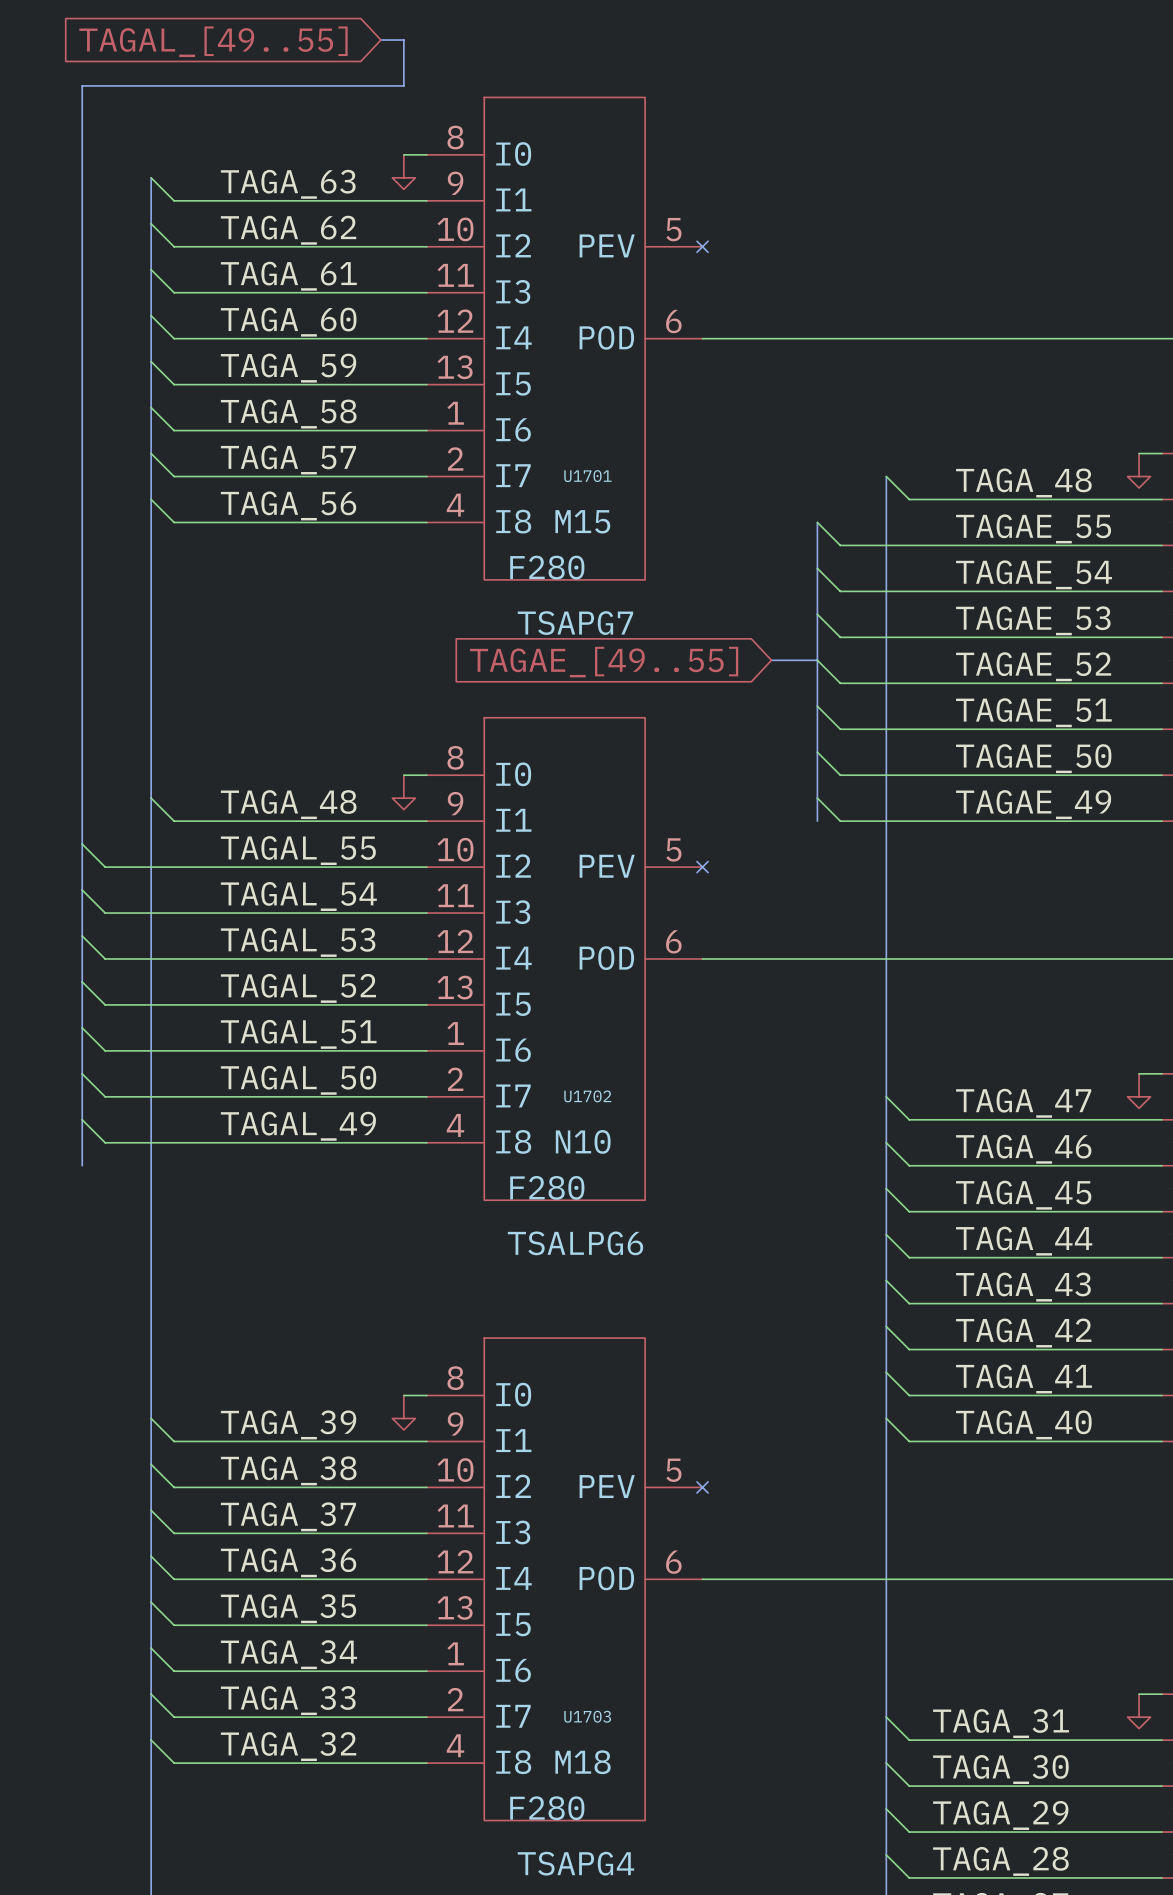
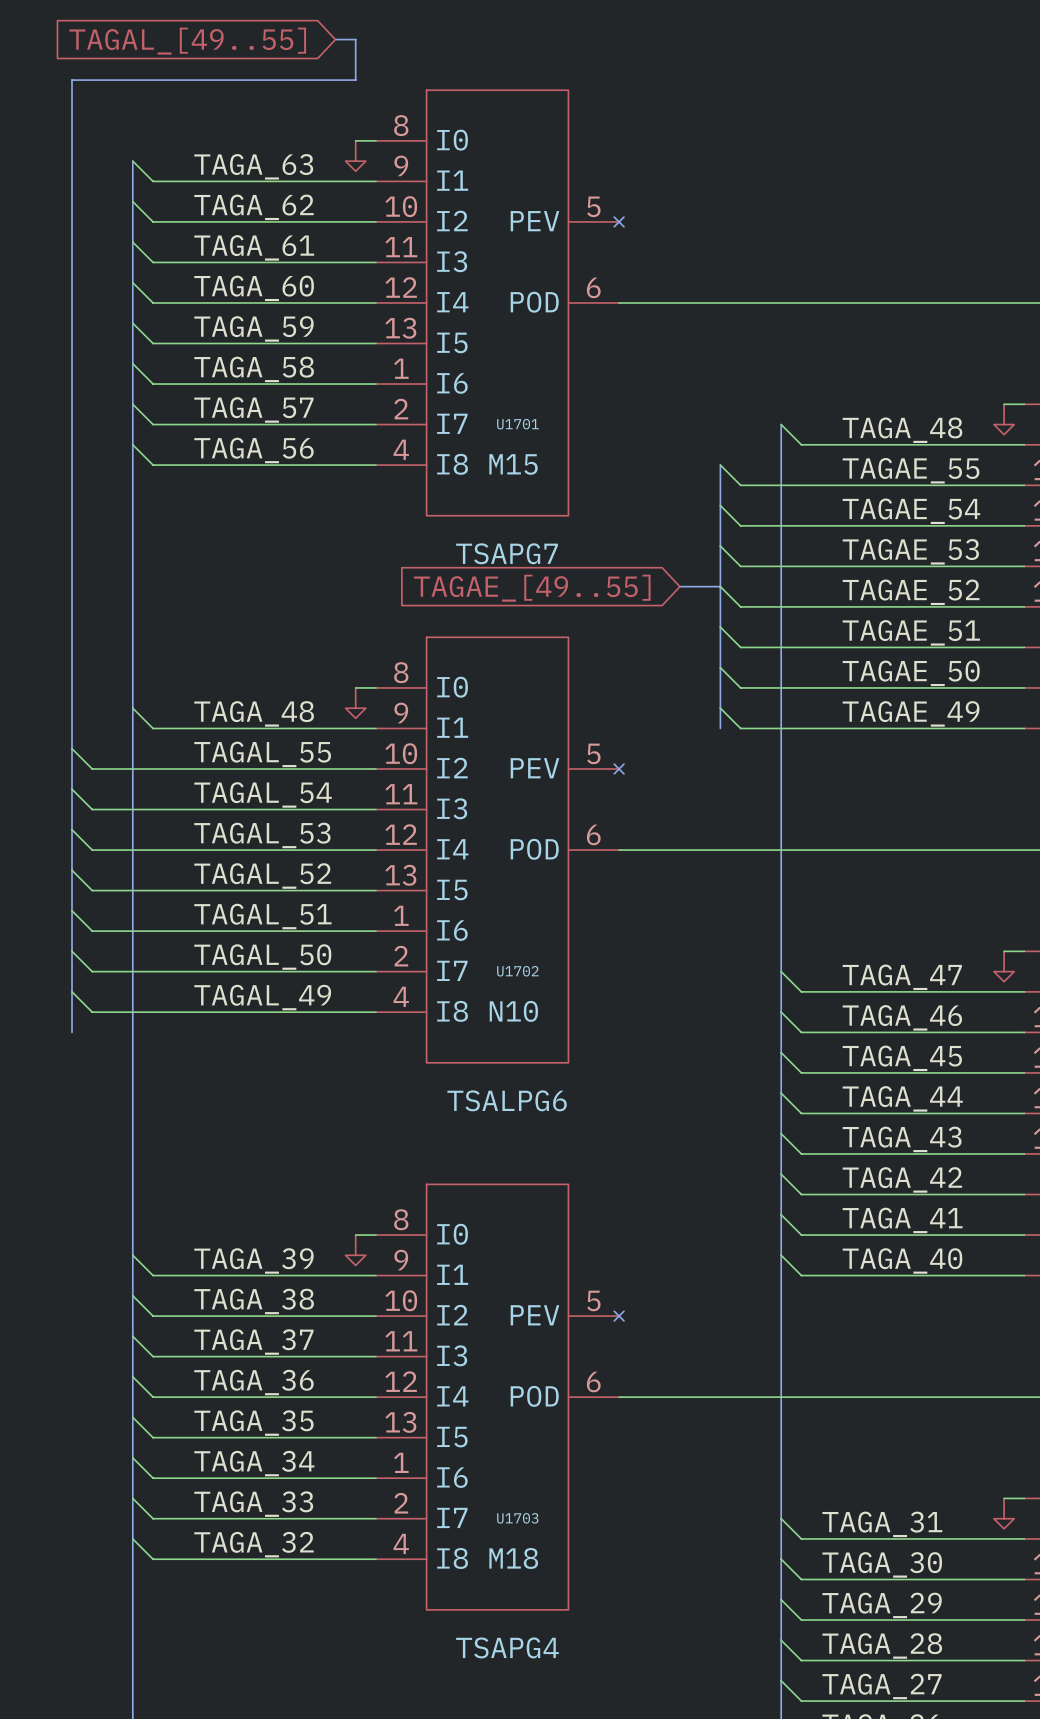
U1701 value: F280 (547, 567) -> none
U1702 value: F280 (547, 1187) -> none
U1703 value: F280 (547, 1808) -> none

